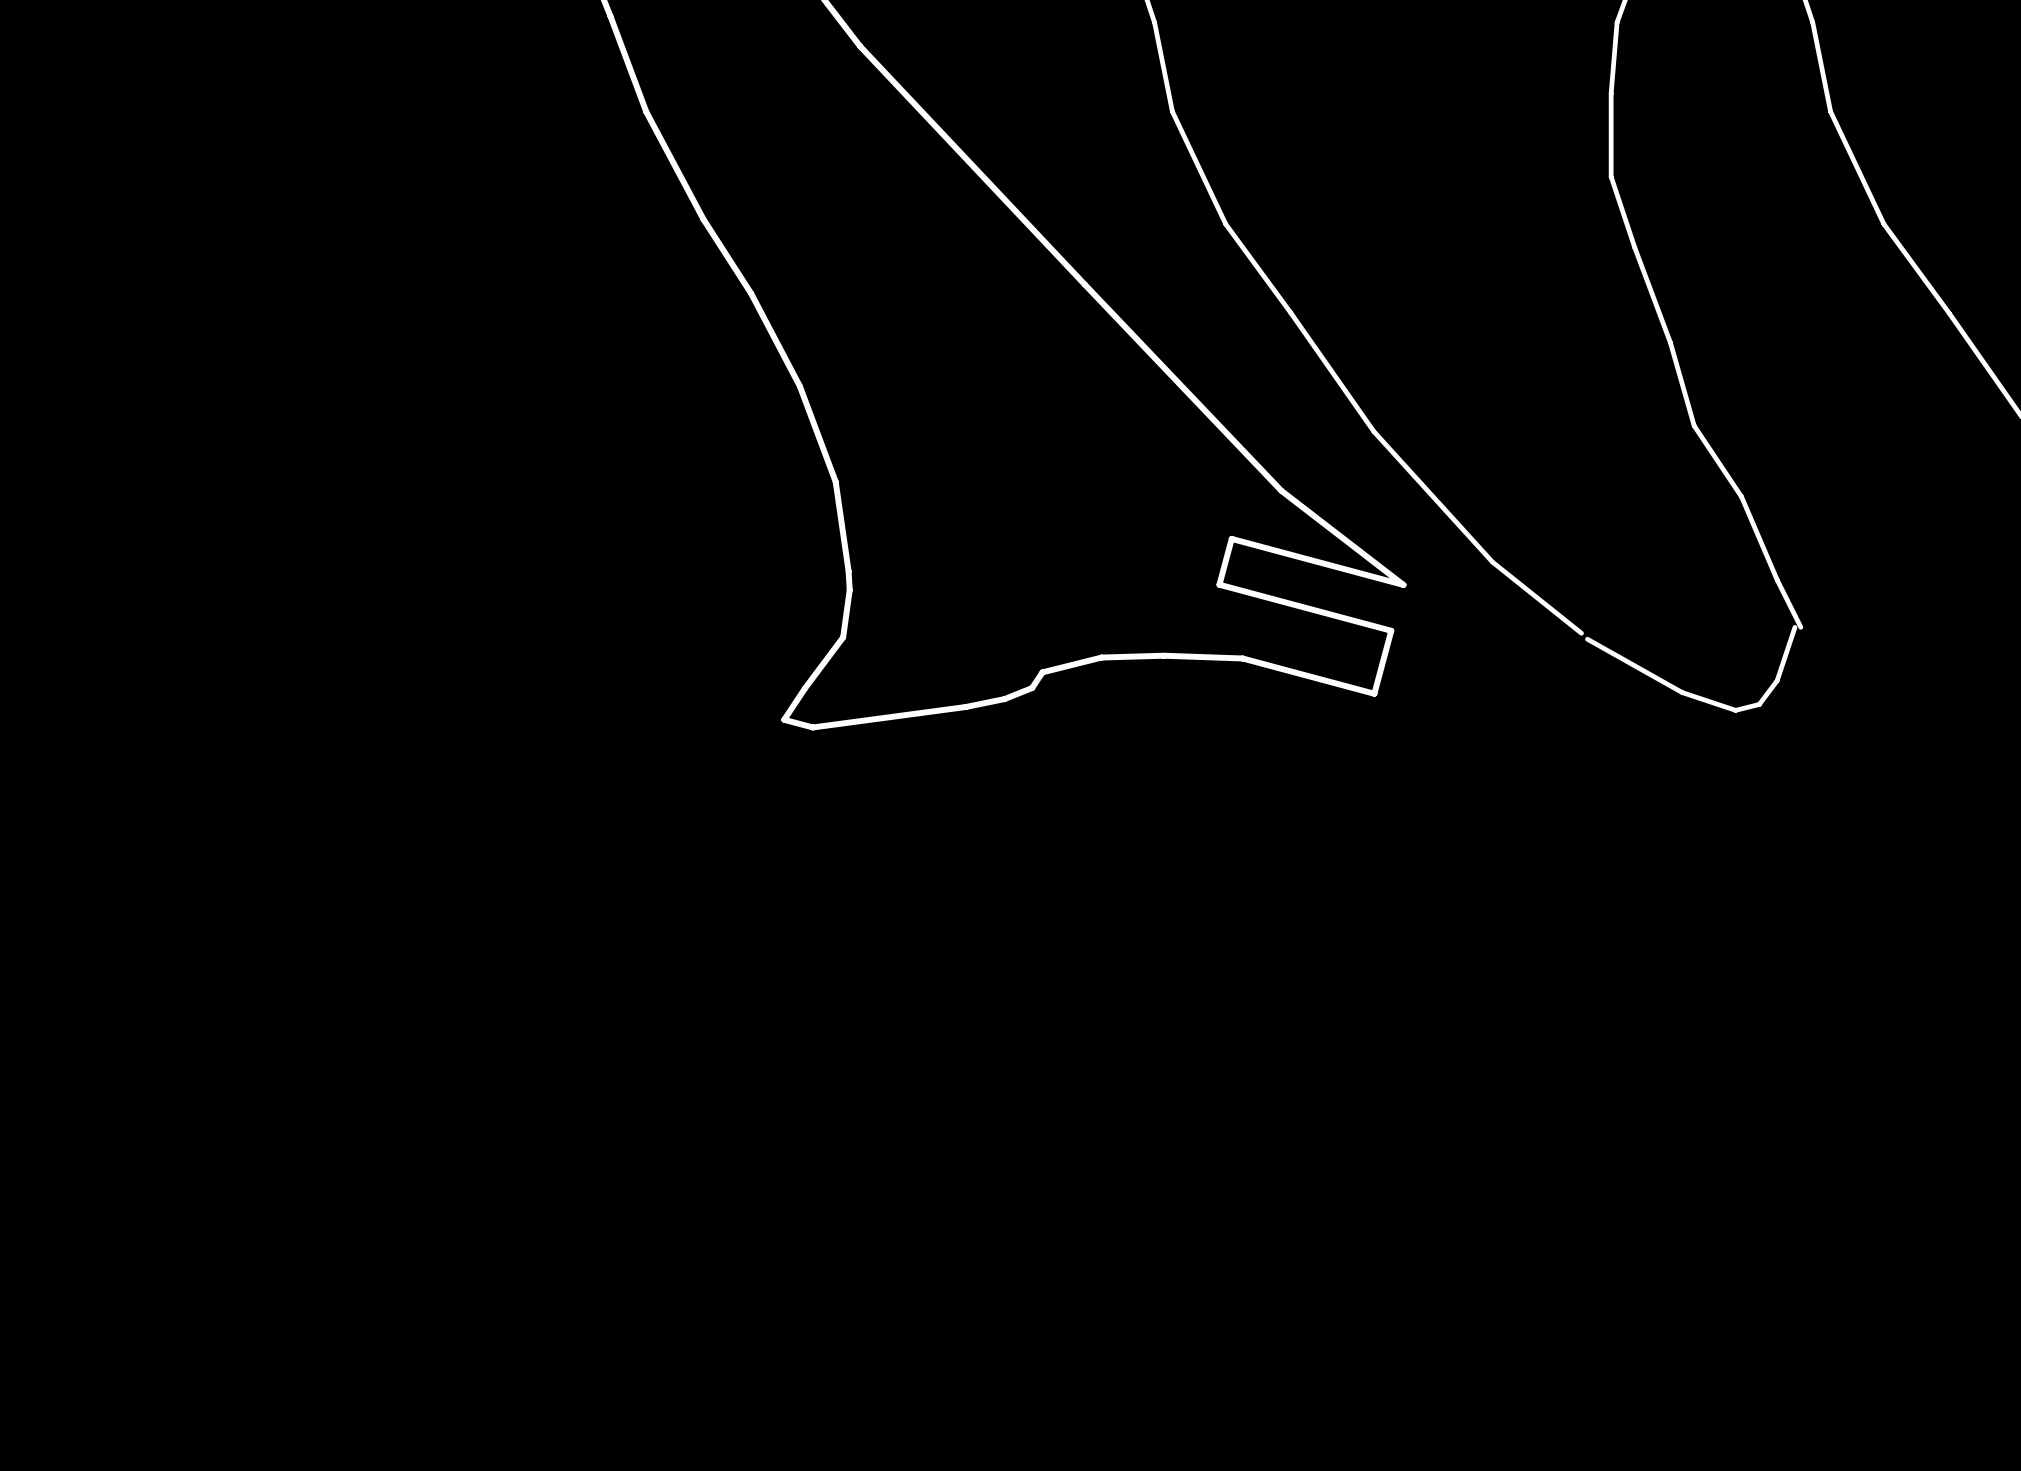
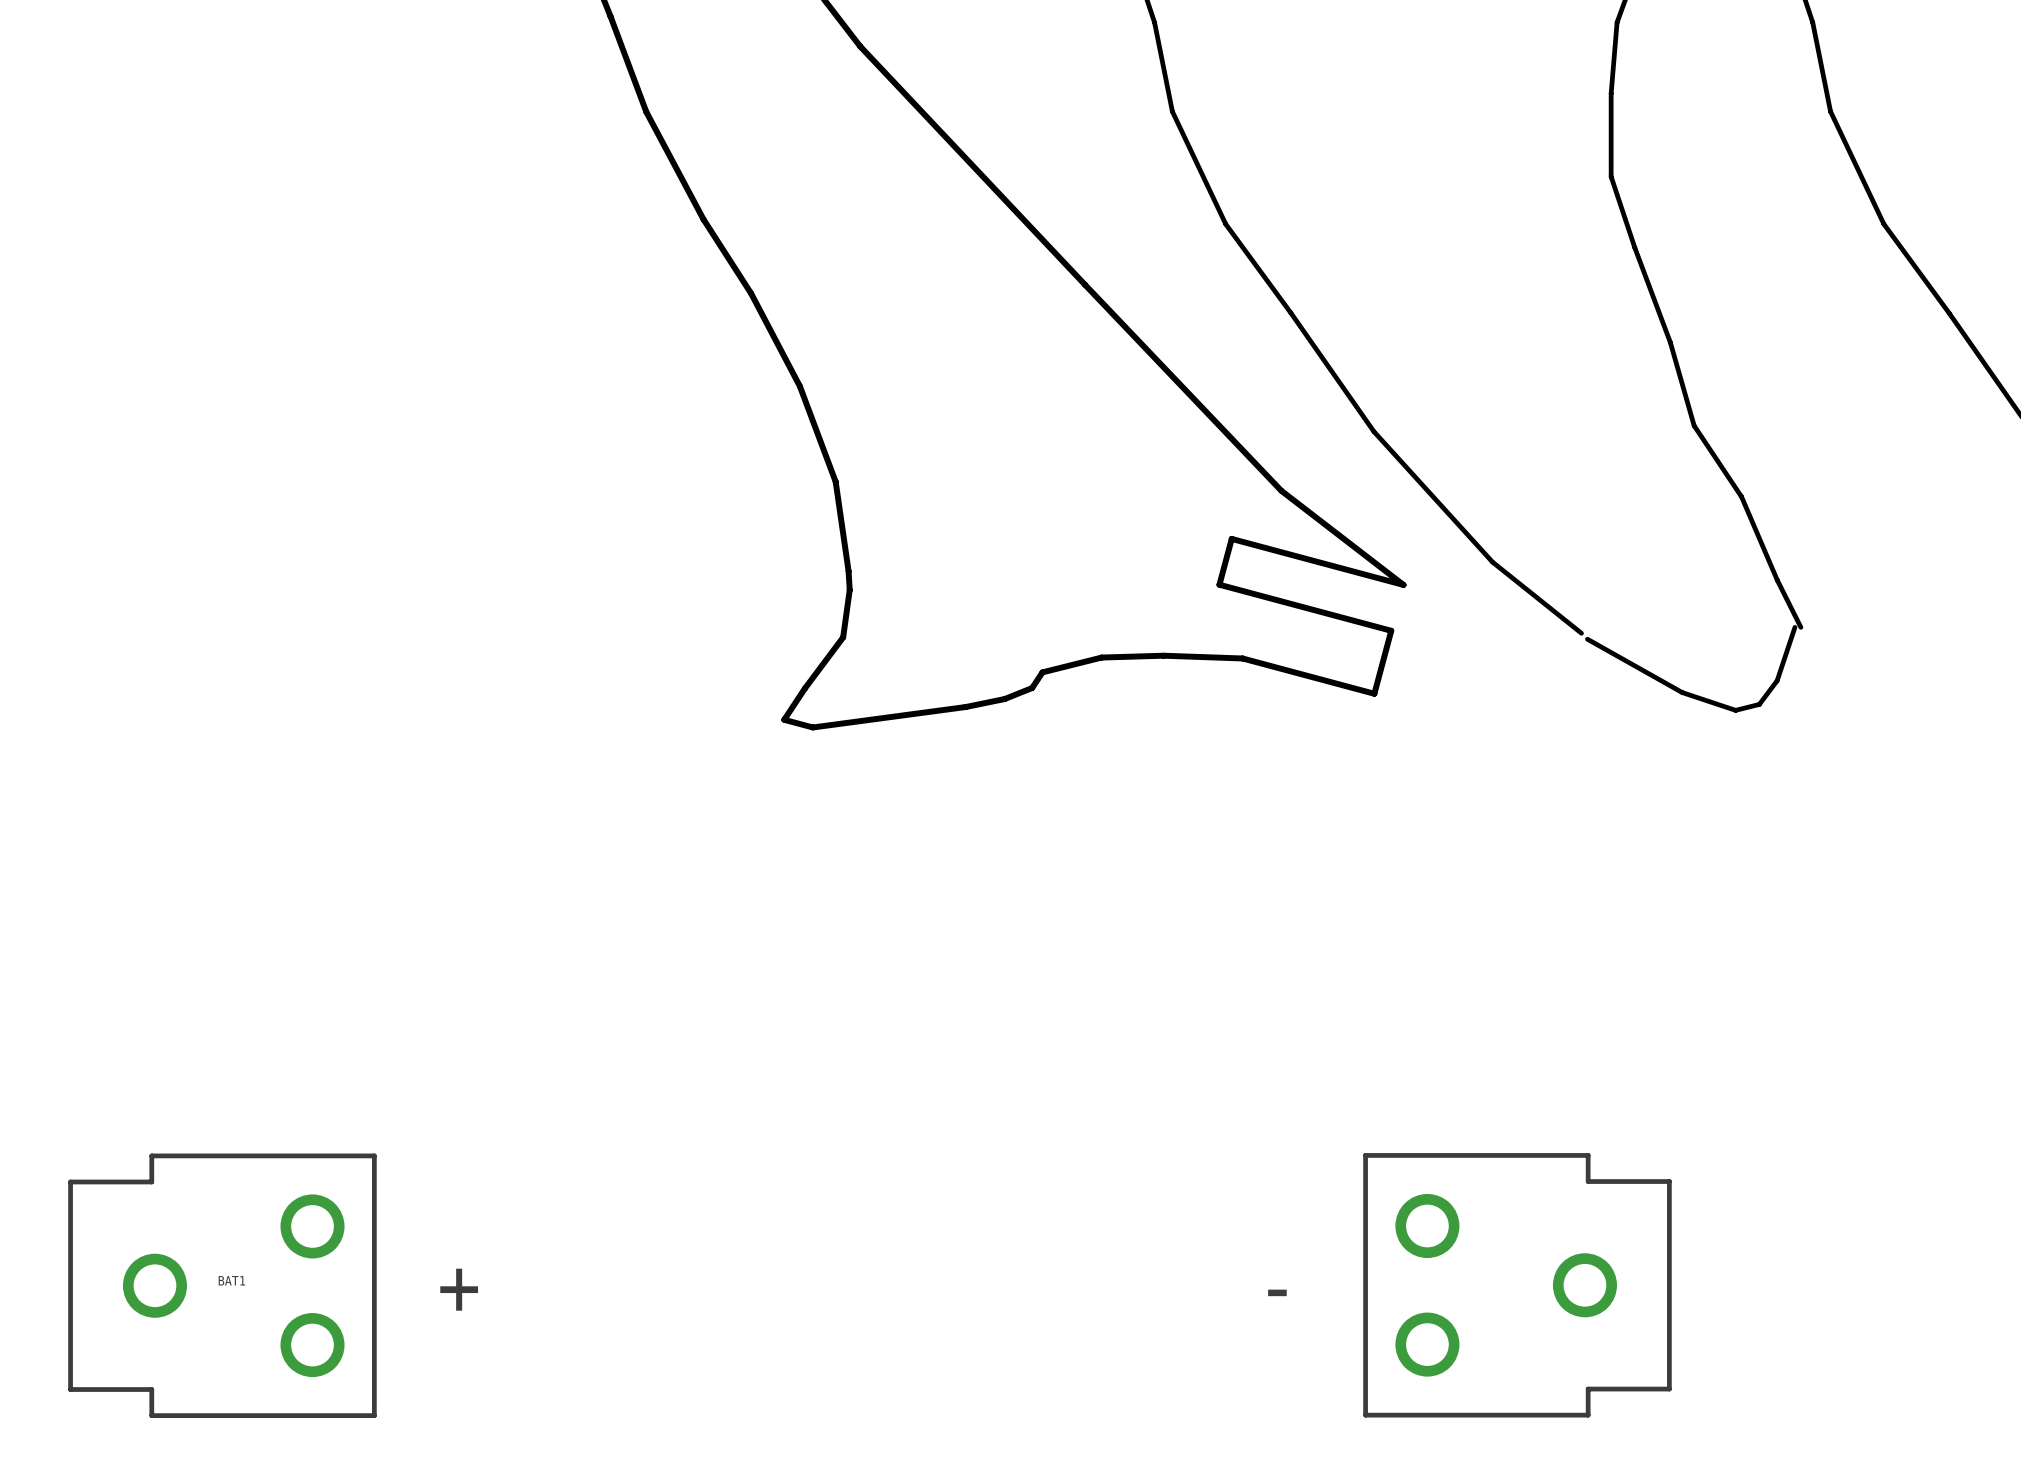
BAT1: none -> (869, 1285)

